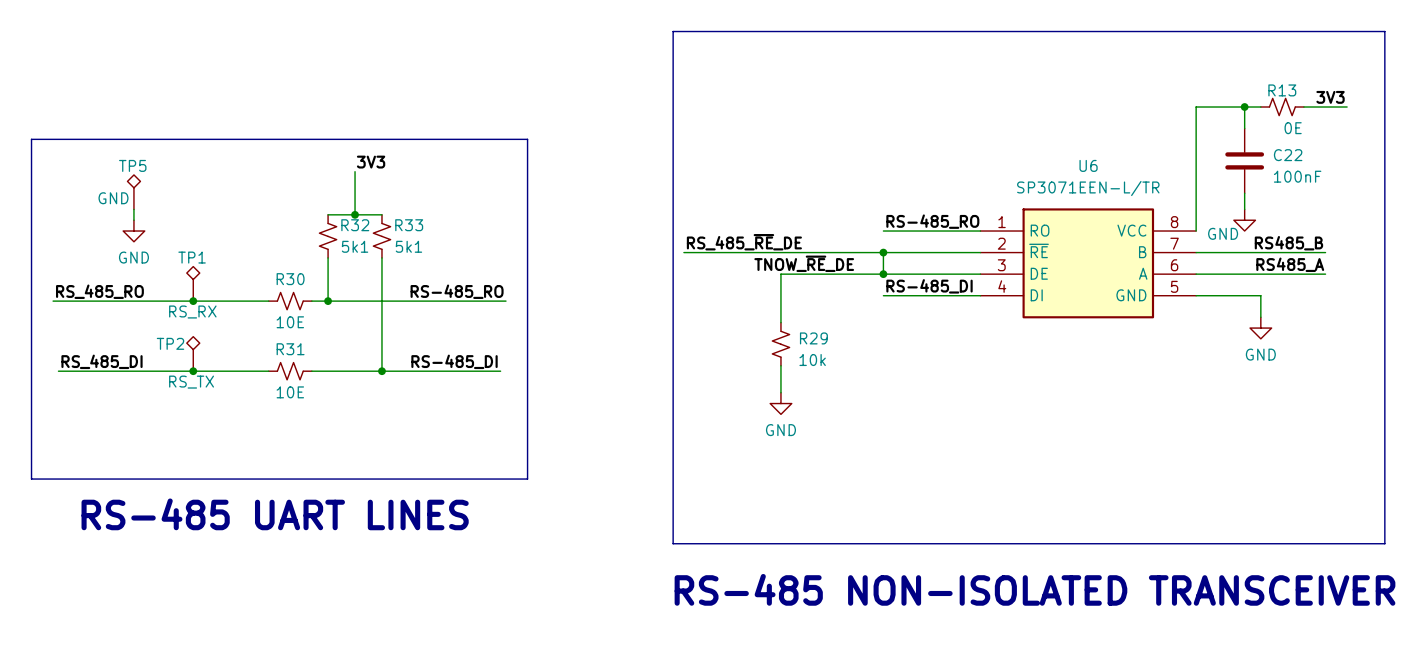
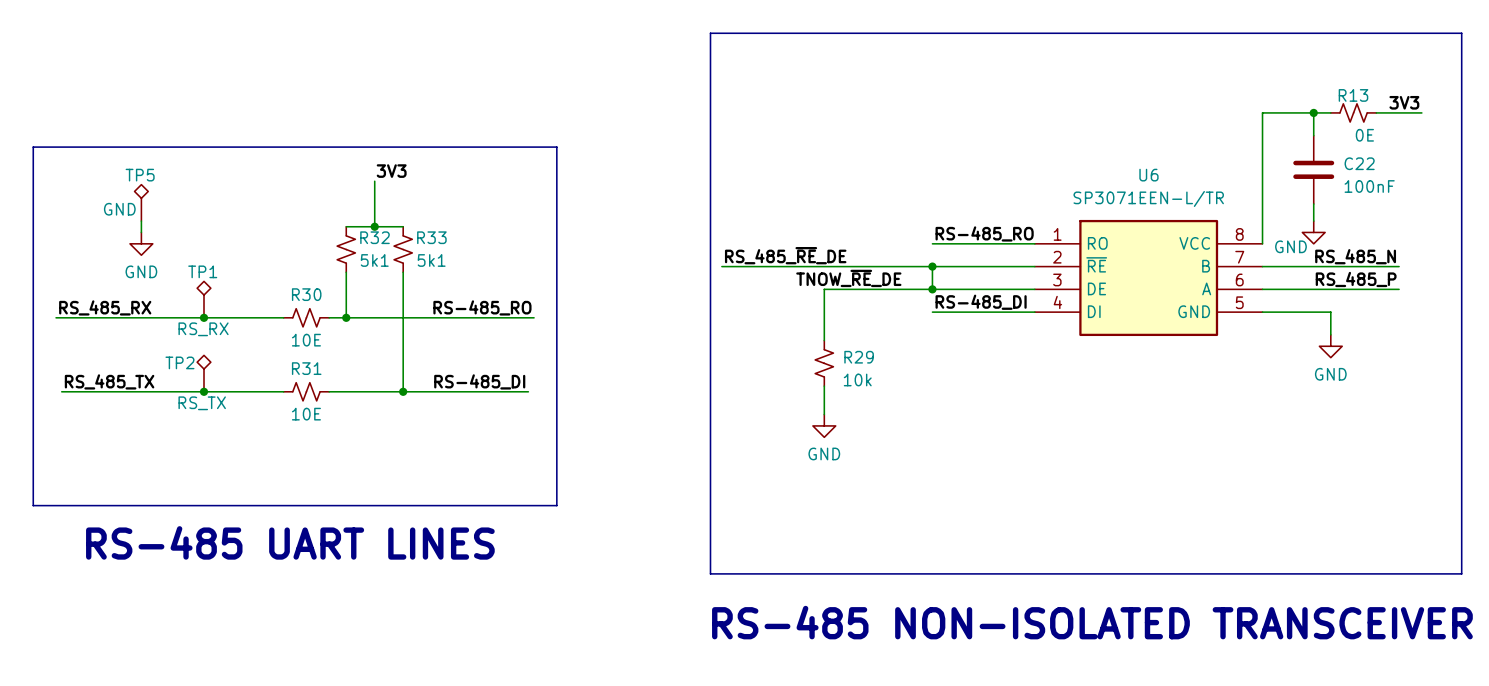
label: RS485_B (1288, 243) -> RS_485_N (1355, 256)
label: RS485_A (1290, 264) -> RS_485_P (1356, 279)
label: RS_485_RO (99, 291) -> RS_485_RX (105, 307)
label: RS_485_DI (102, 361) -> RS_485_TX (109, 381)

